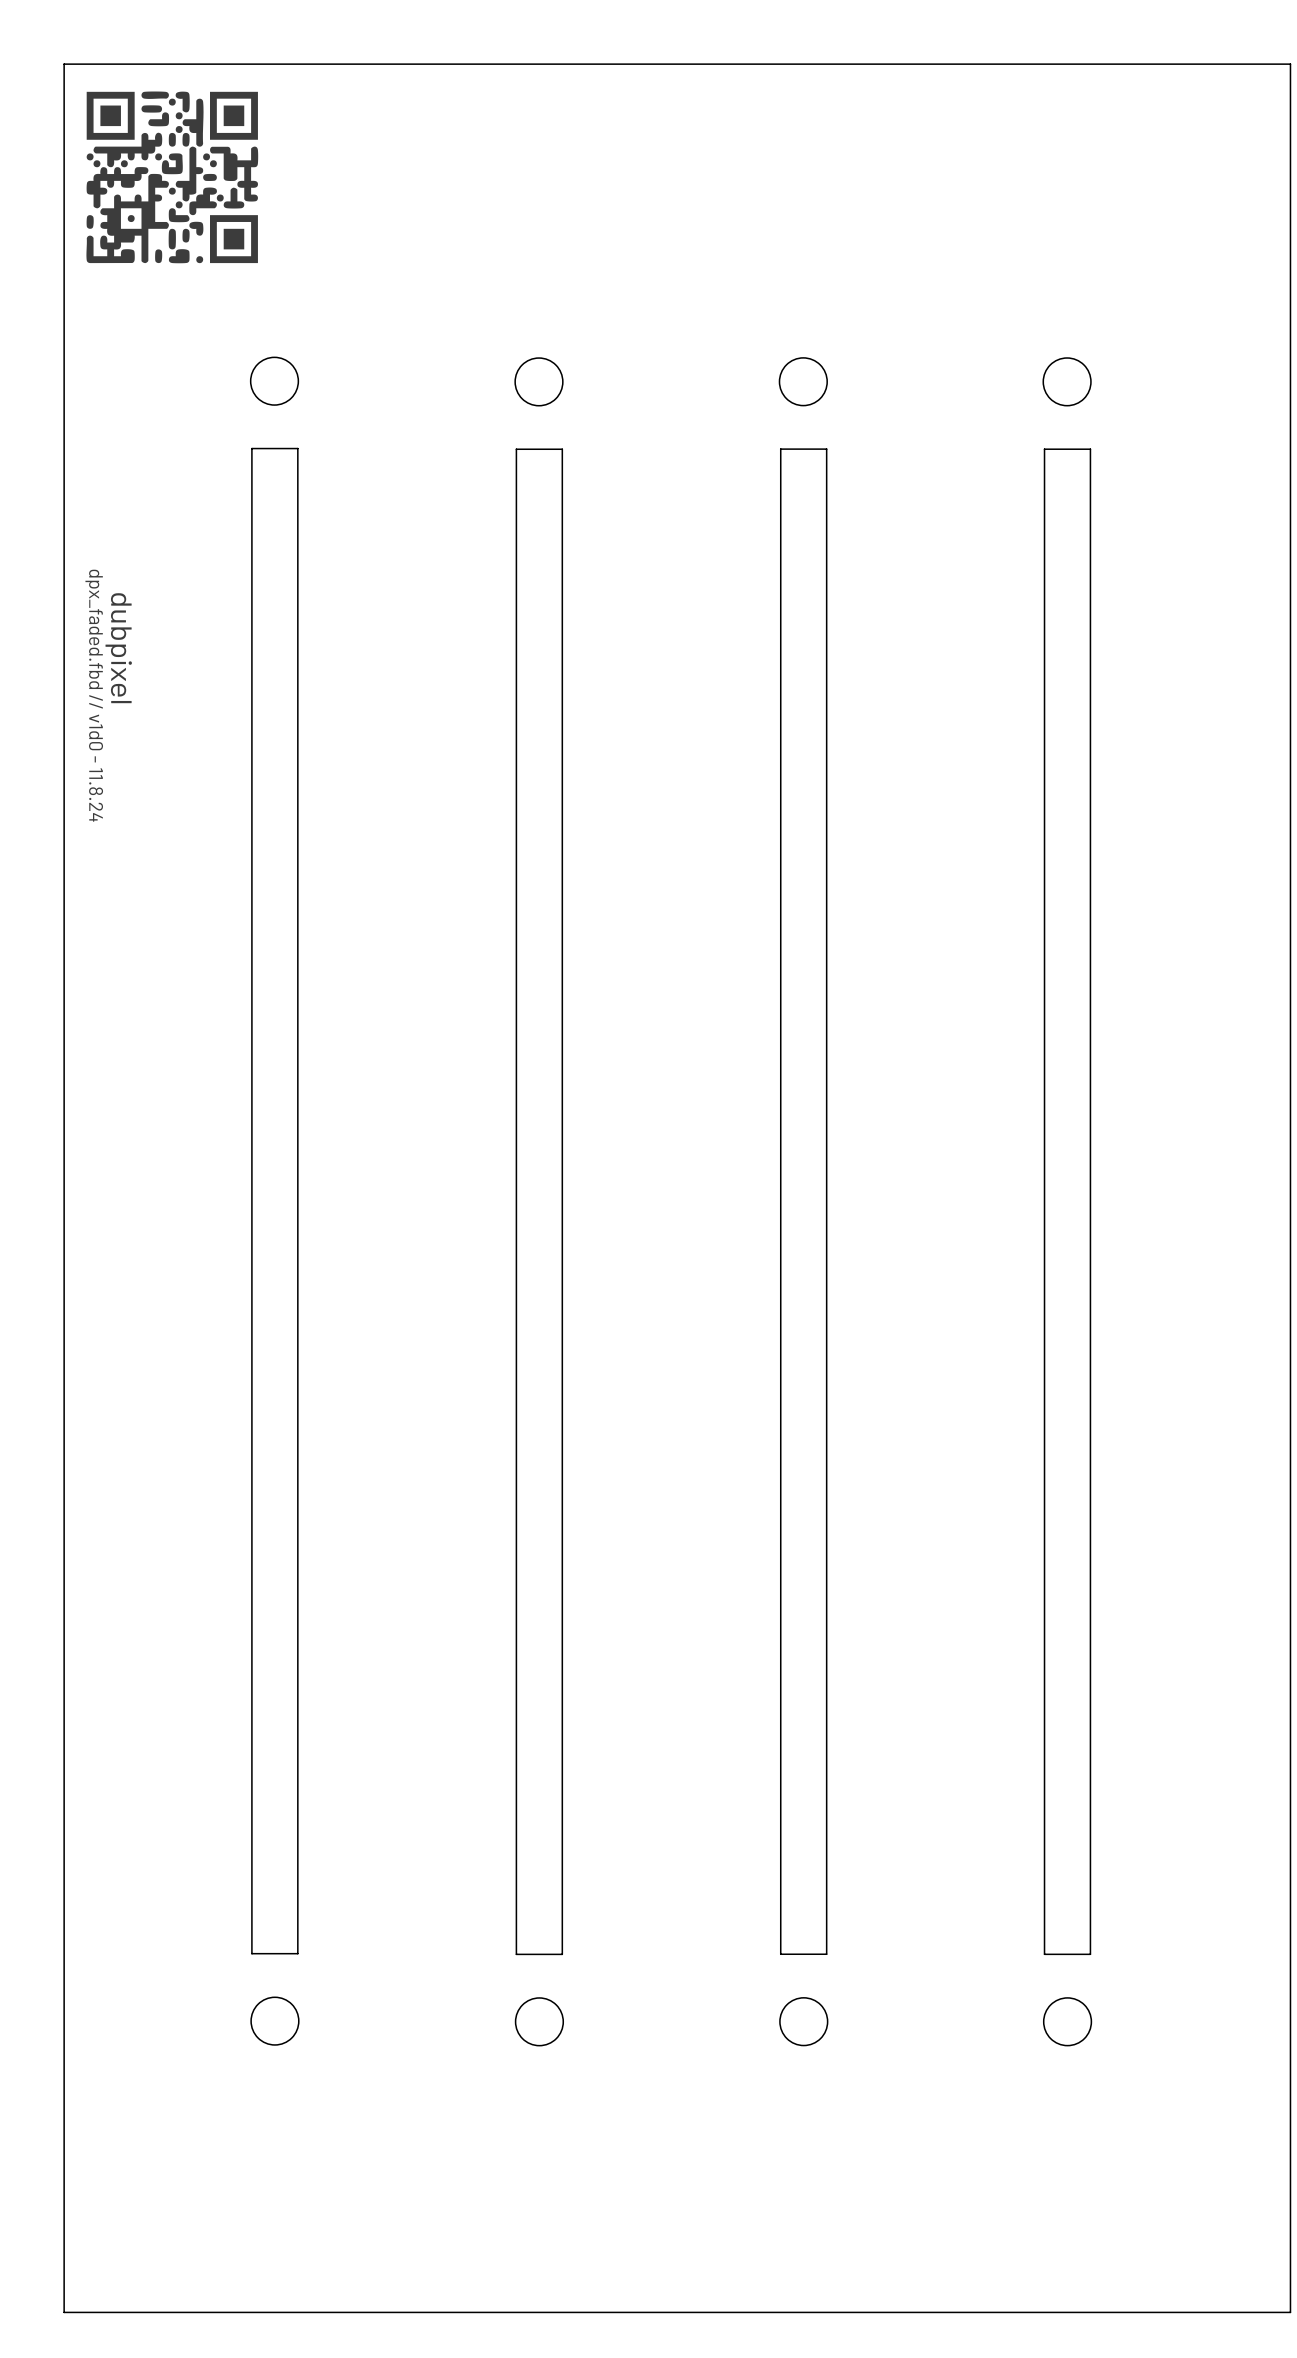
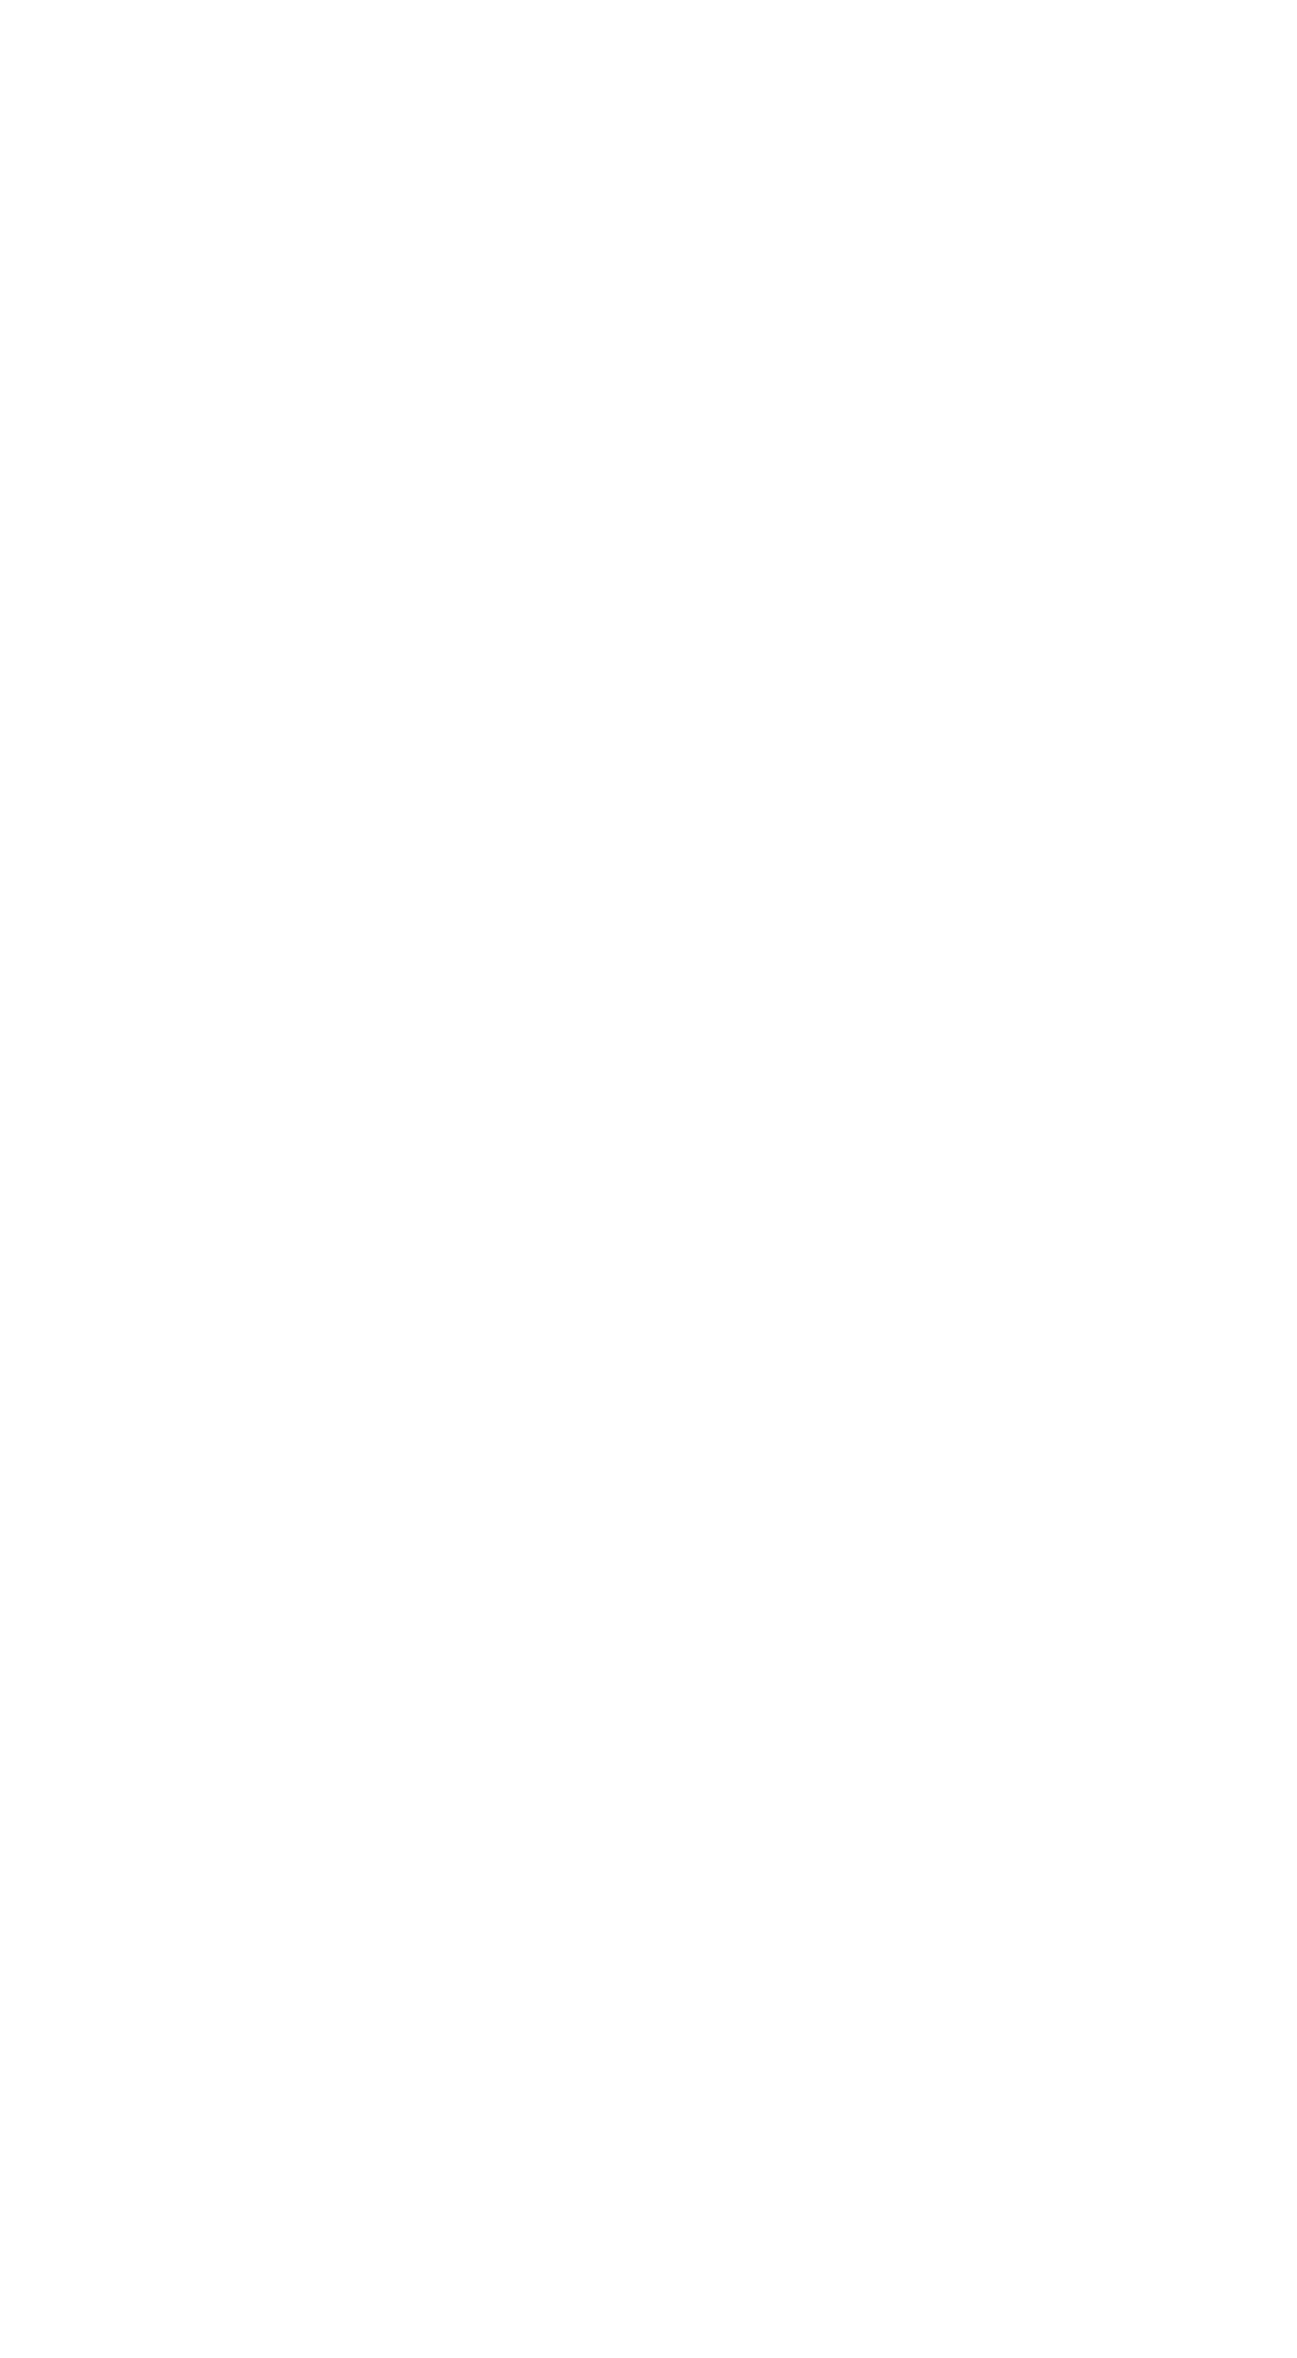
board edge: (1290, 64) (64, 64) (64, 2312) (1290, 2312) (1290, 64) -> none
drawing: [86, 91, 259, 264] -> none
round board edge: [250, 357, 299, 406] -> none
round board edge: [514, 357, 564, 407] -> none
round board edge: [779, 357, 828, 406] -> none
round board edge: [1042, 357, 1092, 407] -> none
board edge: (297, 448) (251, 448) (251, 1953) (297, 1953) (297, 448) -> none
board edge: (562, 449) (516, 449) (516, 1954) (562, 1954) (562, 449) -> none
board edge: (826, 449) (780, 449) (780, 1954) (826, 1954) (826, 449) -> none
board edge: (1090, 449) (1044, 449) (1044, 1954) (1090, 1954) (1090, 449) -> none
text: dubpixel (118, 648) -> none
text: dpx_faded.fbd // v1d0 - 11.8.24 (94, 695) -> none
round board edge: [250, 1996, 300, 2046] -> none
round board edge: [515, 1997, 564, 2047] -> none
round board edge: [779, 1997, 828, 2046] -> none
round board edge: [1043, 1997, 1092, 2046] -> none

